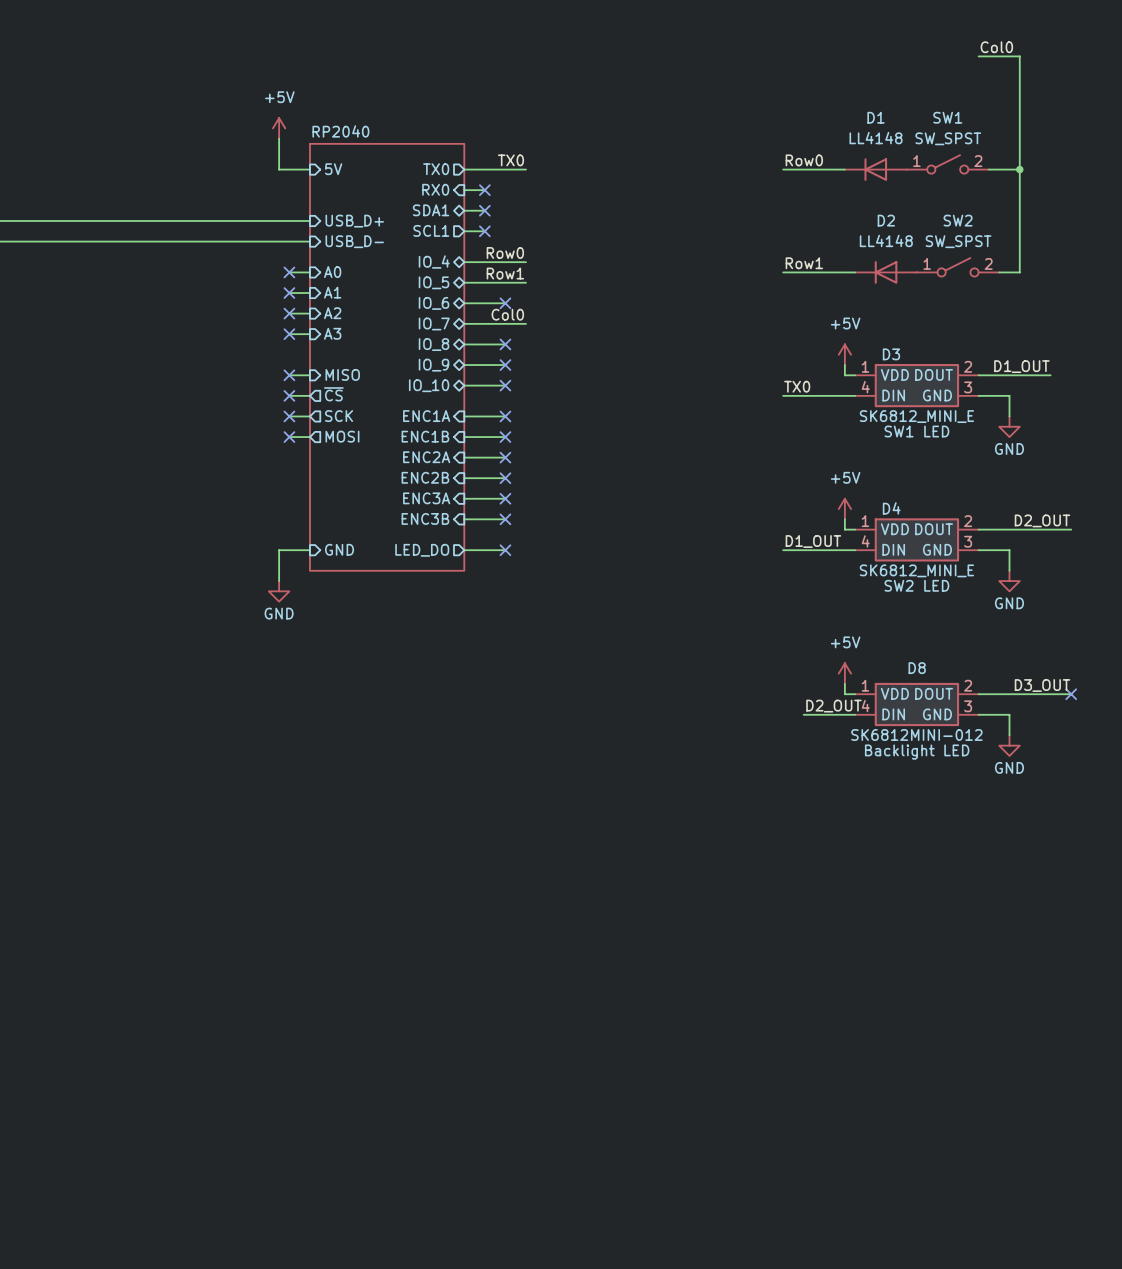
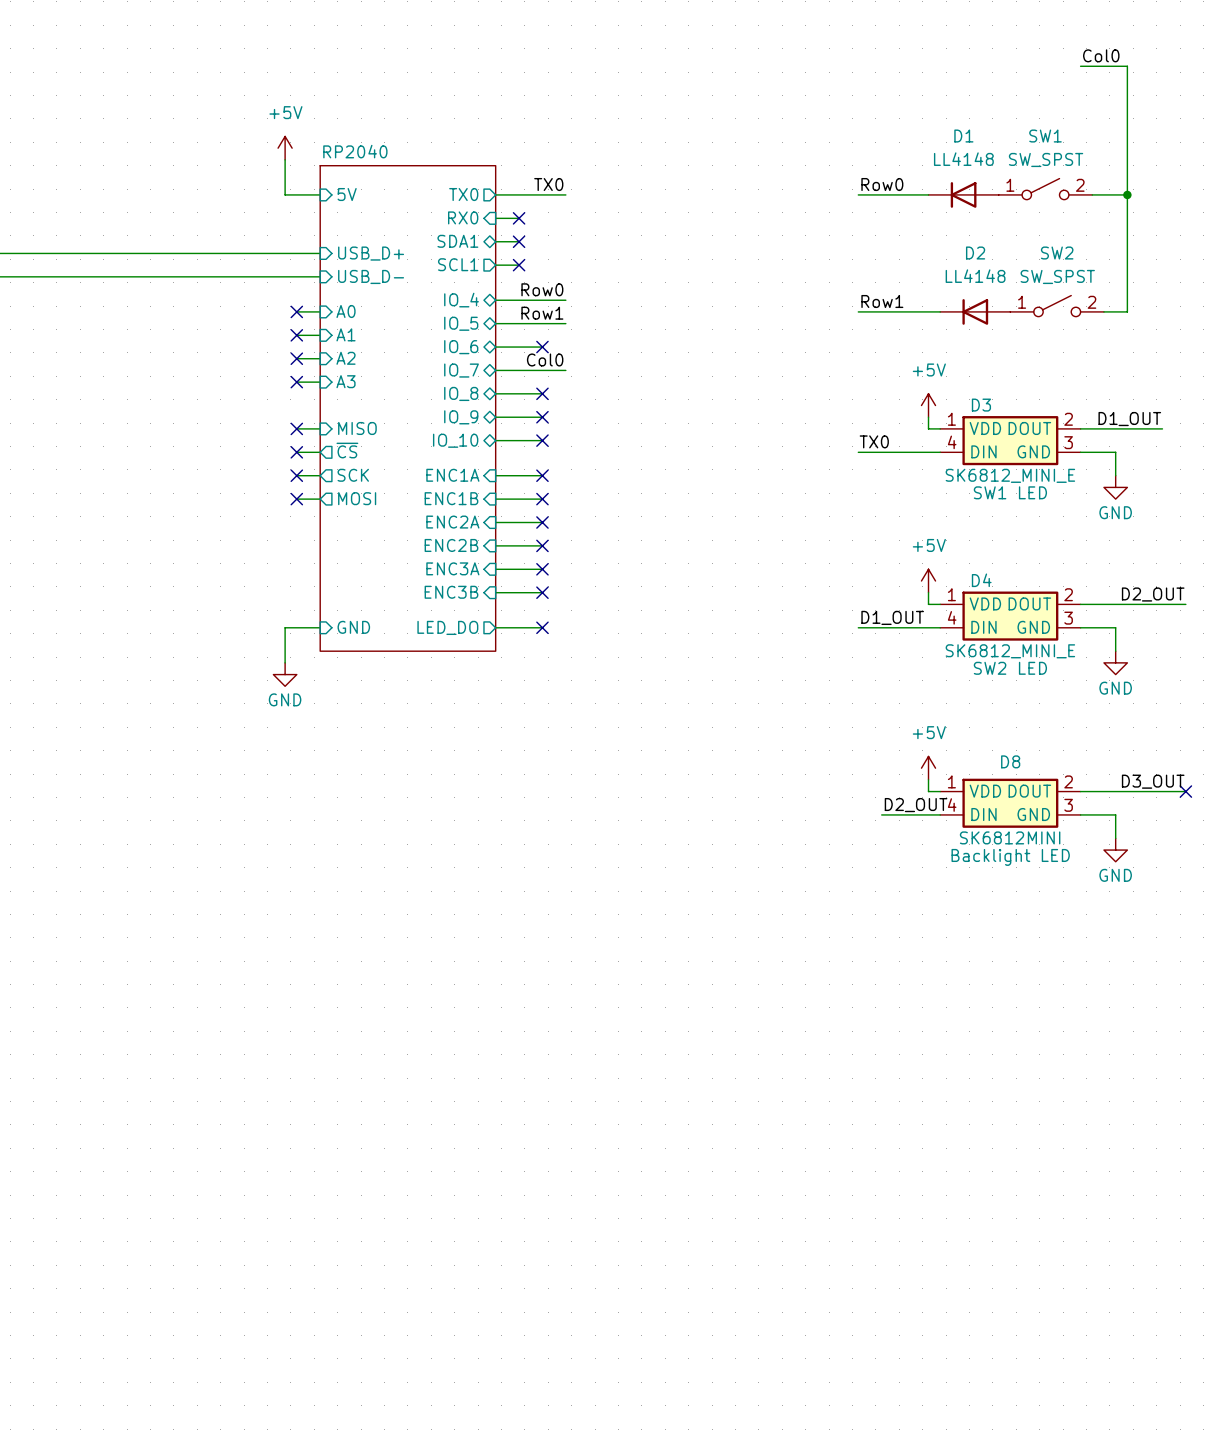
D8 value: SK6812MINI-012 (916, 734) -> SK6812MINI (1010, 837)

